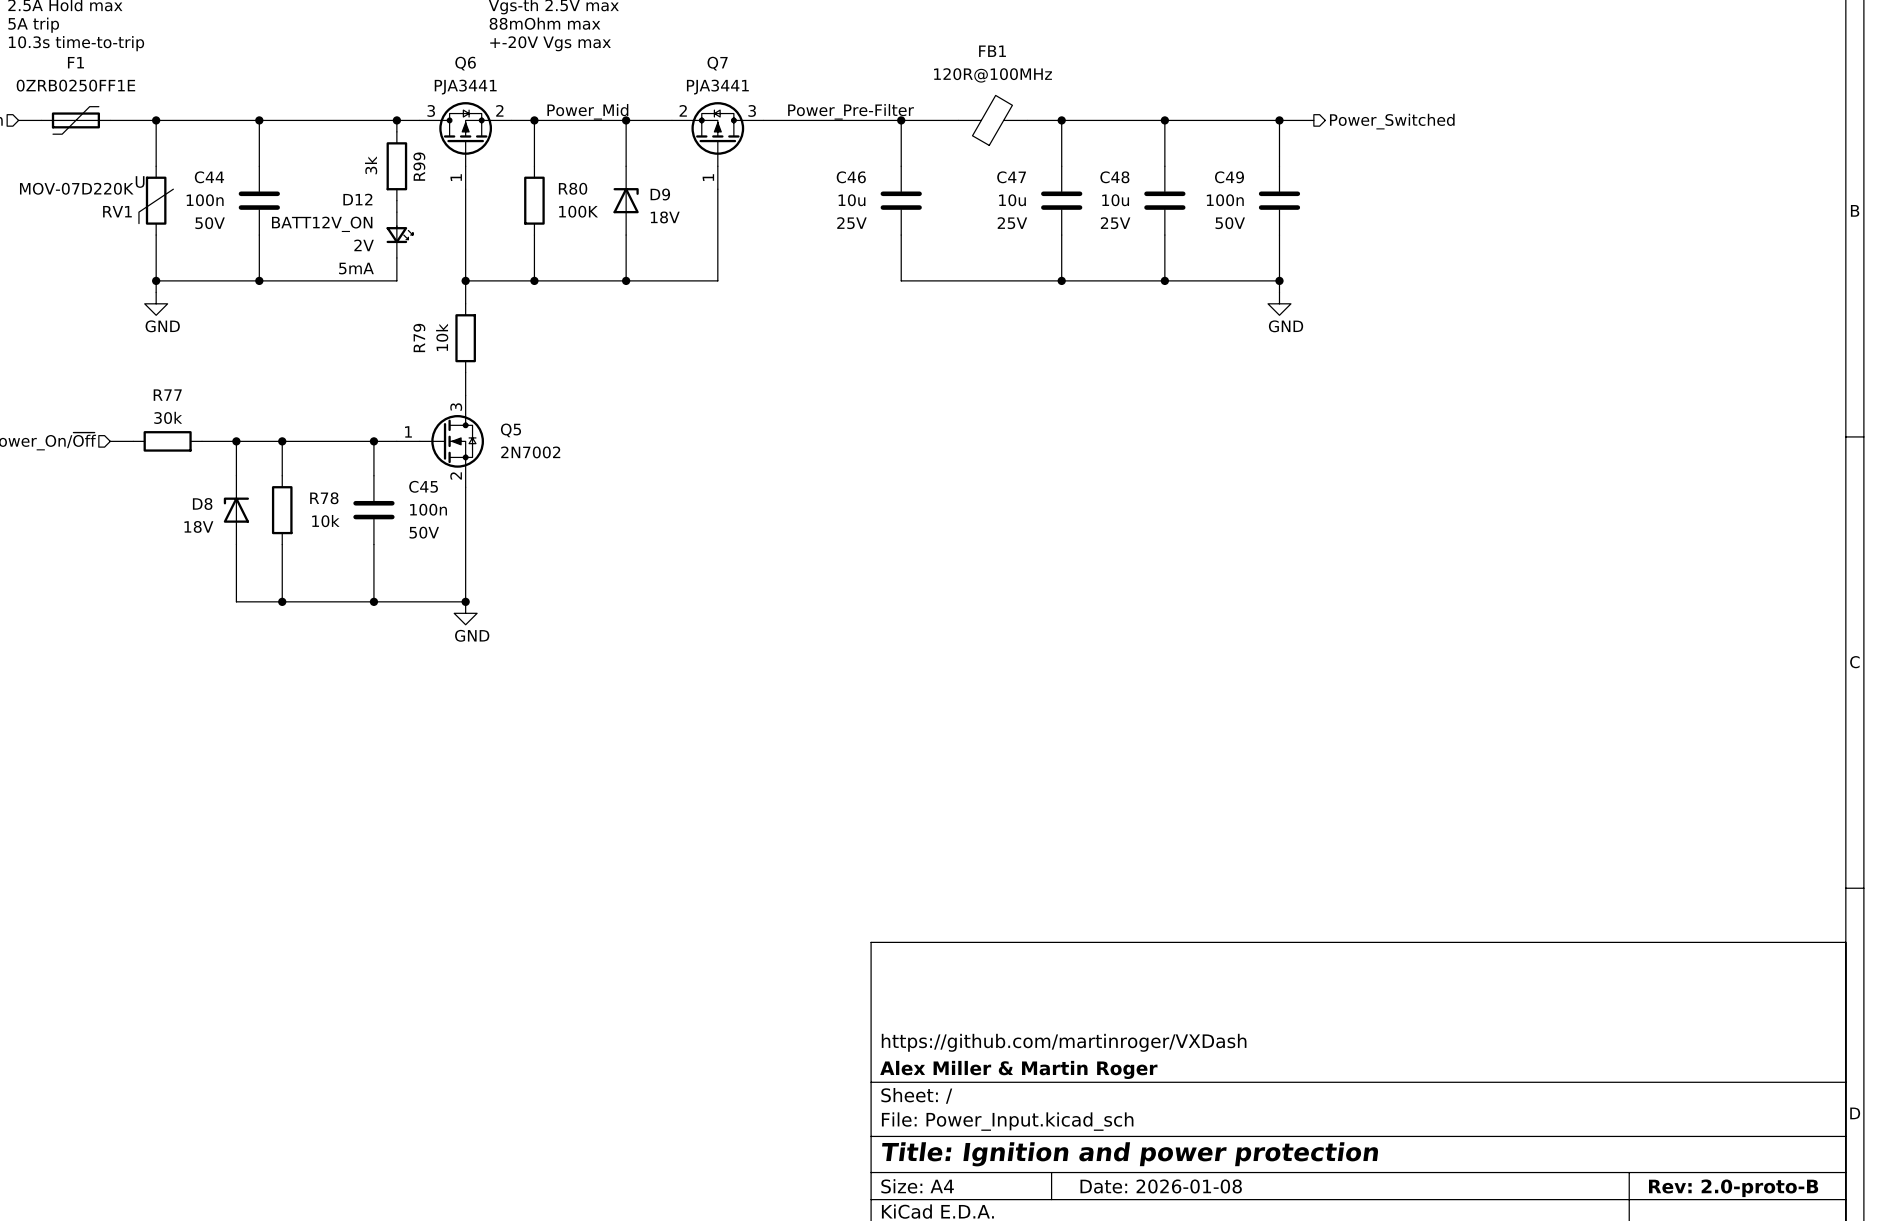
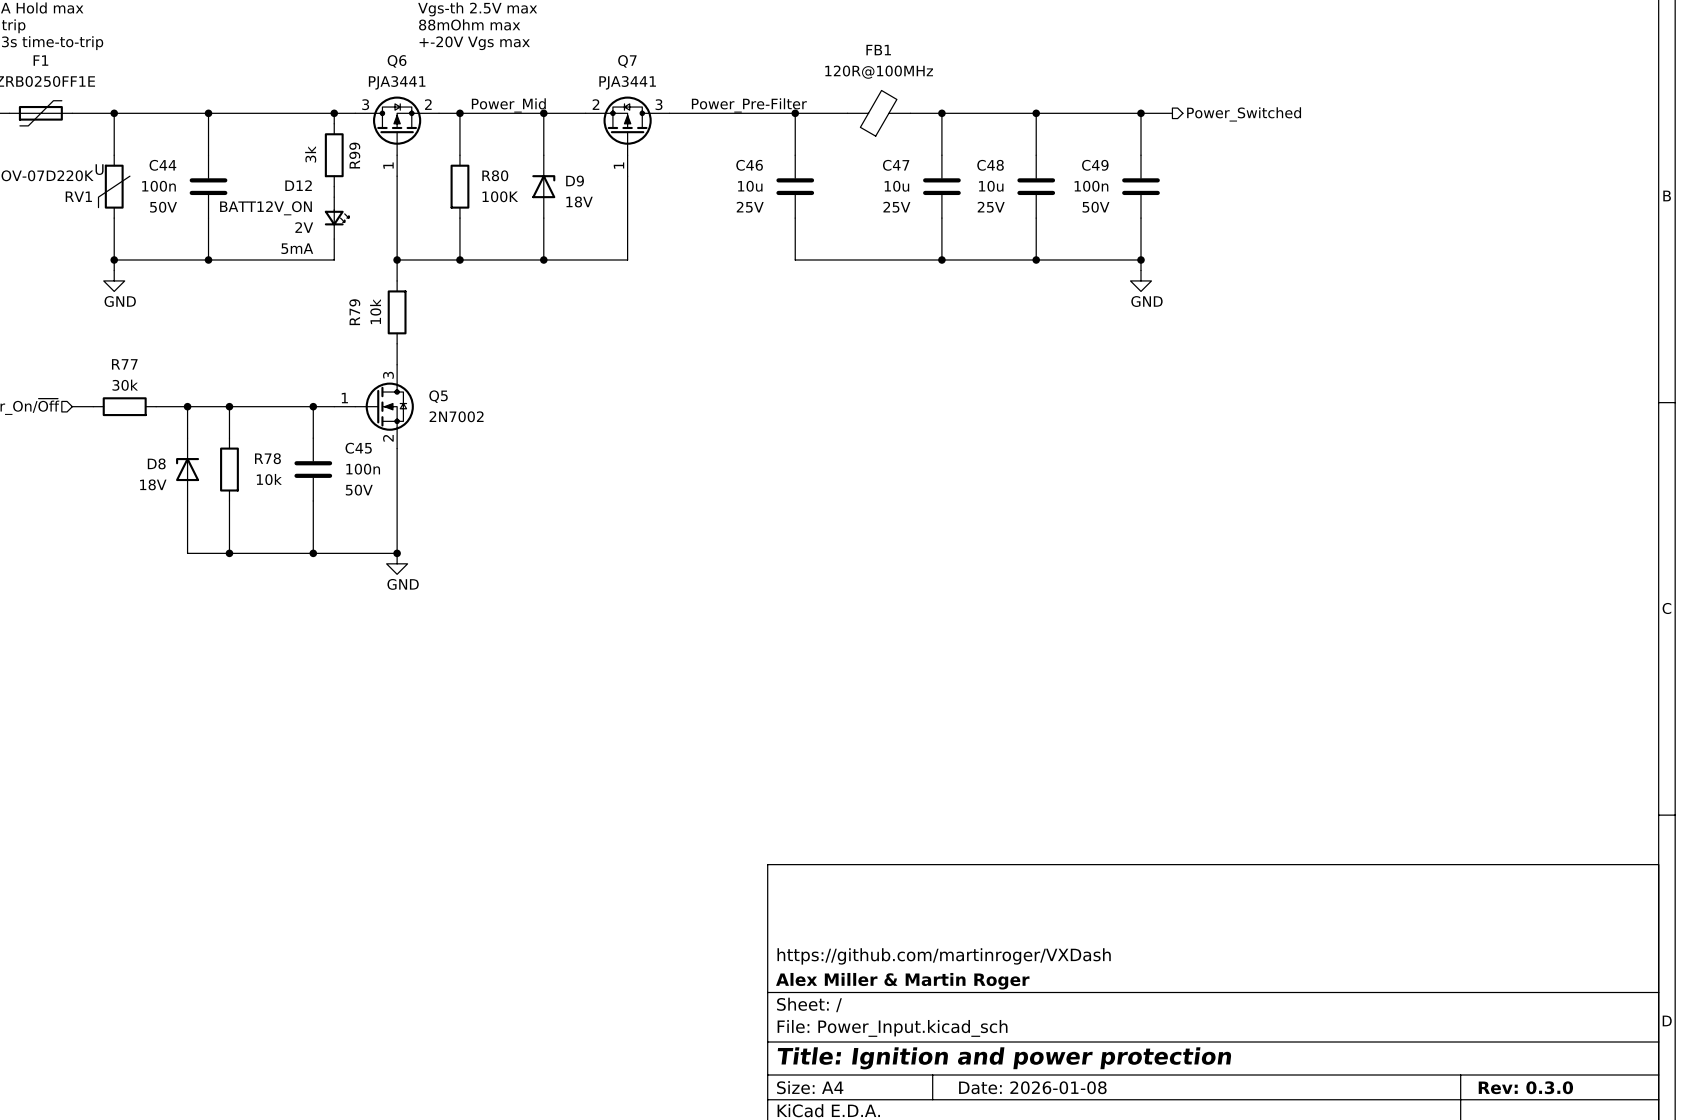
title block: Rev: 2.0-proto-B (1733, 1188) -> Rev: 0.3.0 (1525, 1087)

